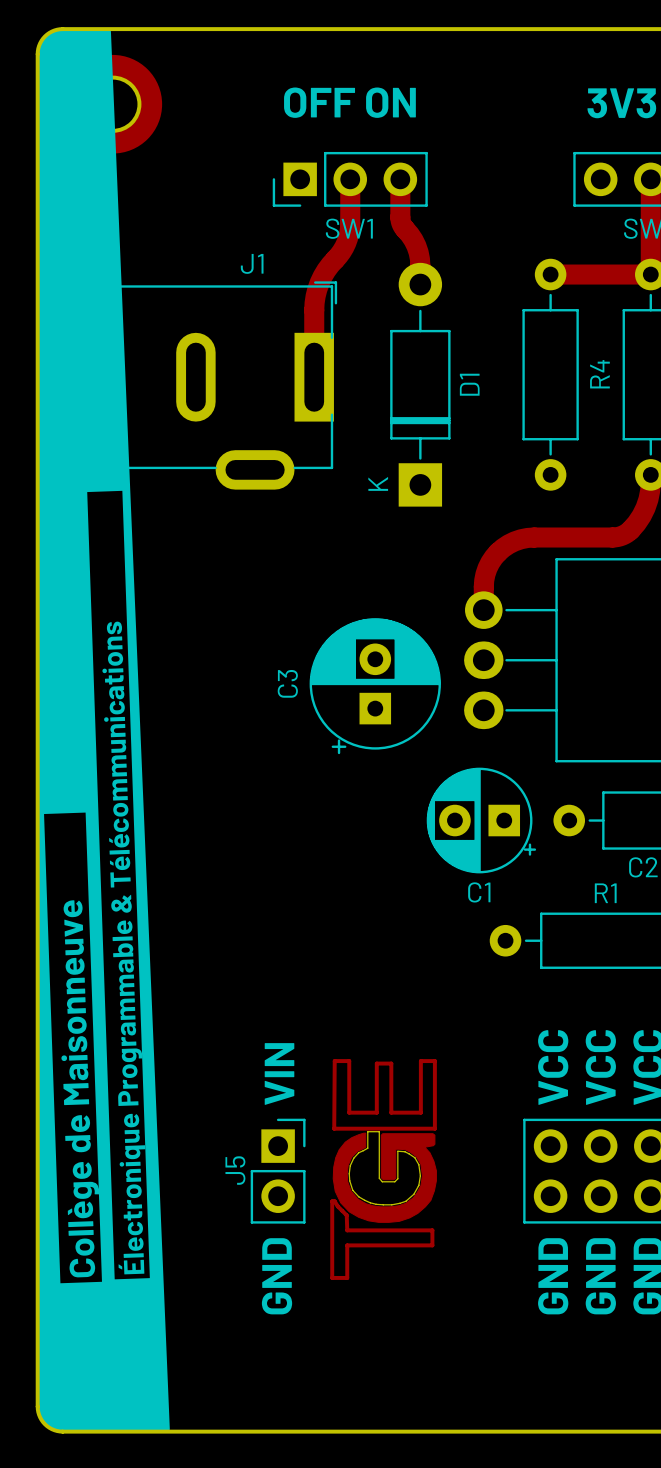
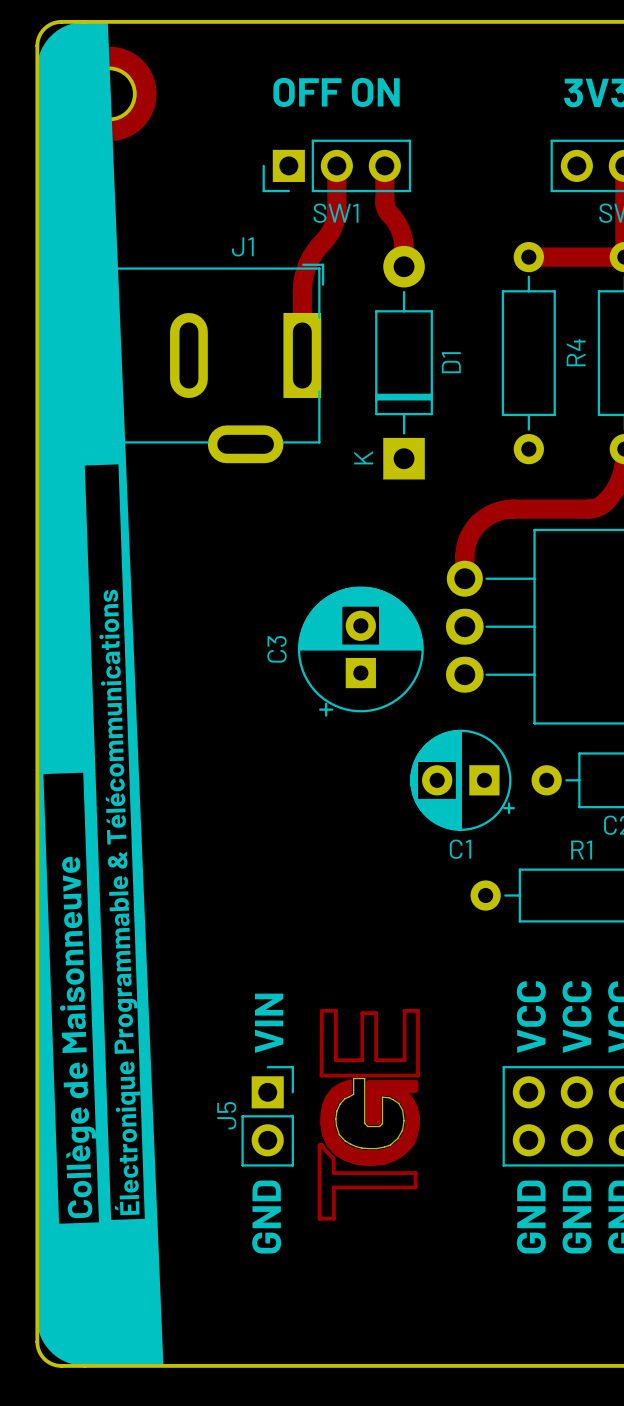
drawing shape: [37, 29, 170, 1432] -> [36, 21, 164, 1366]

